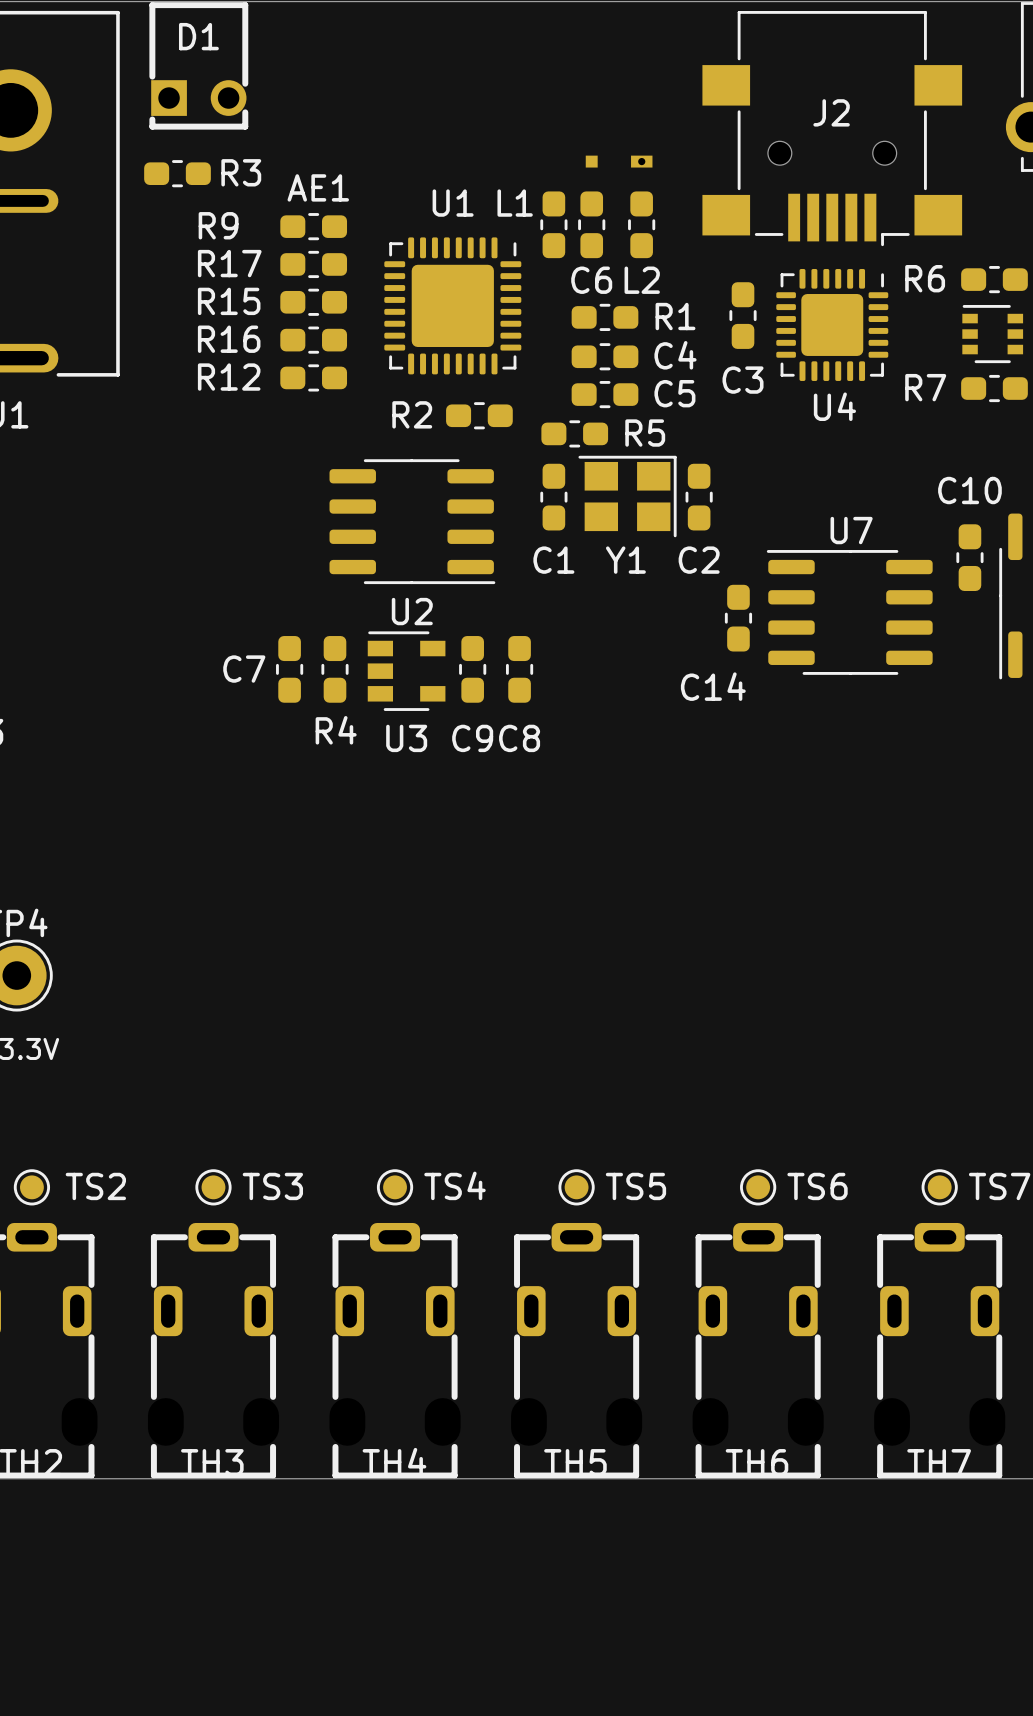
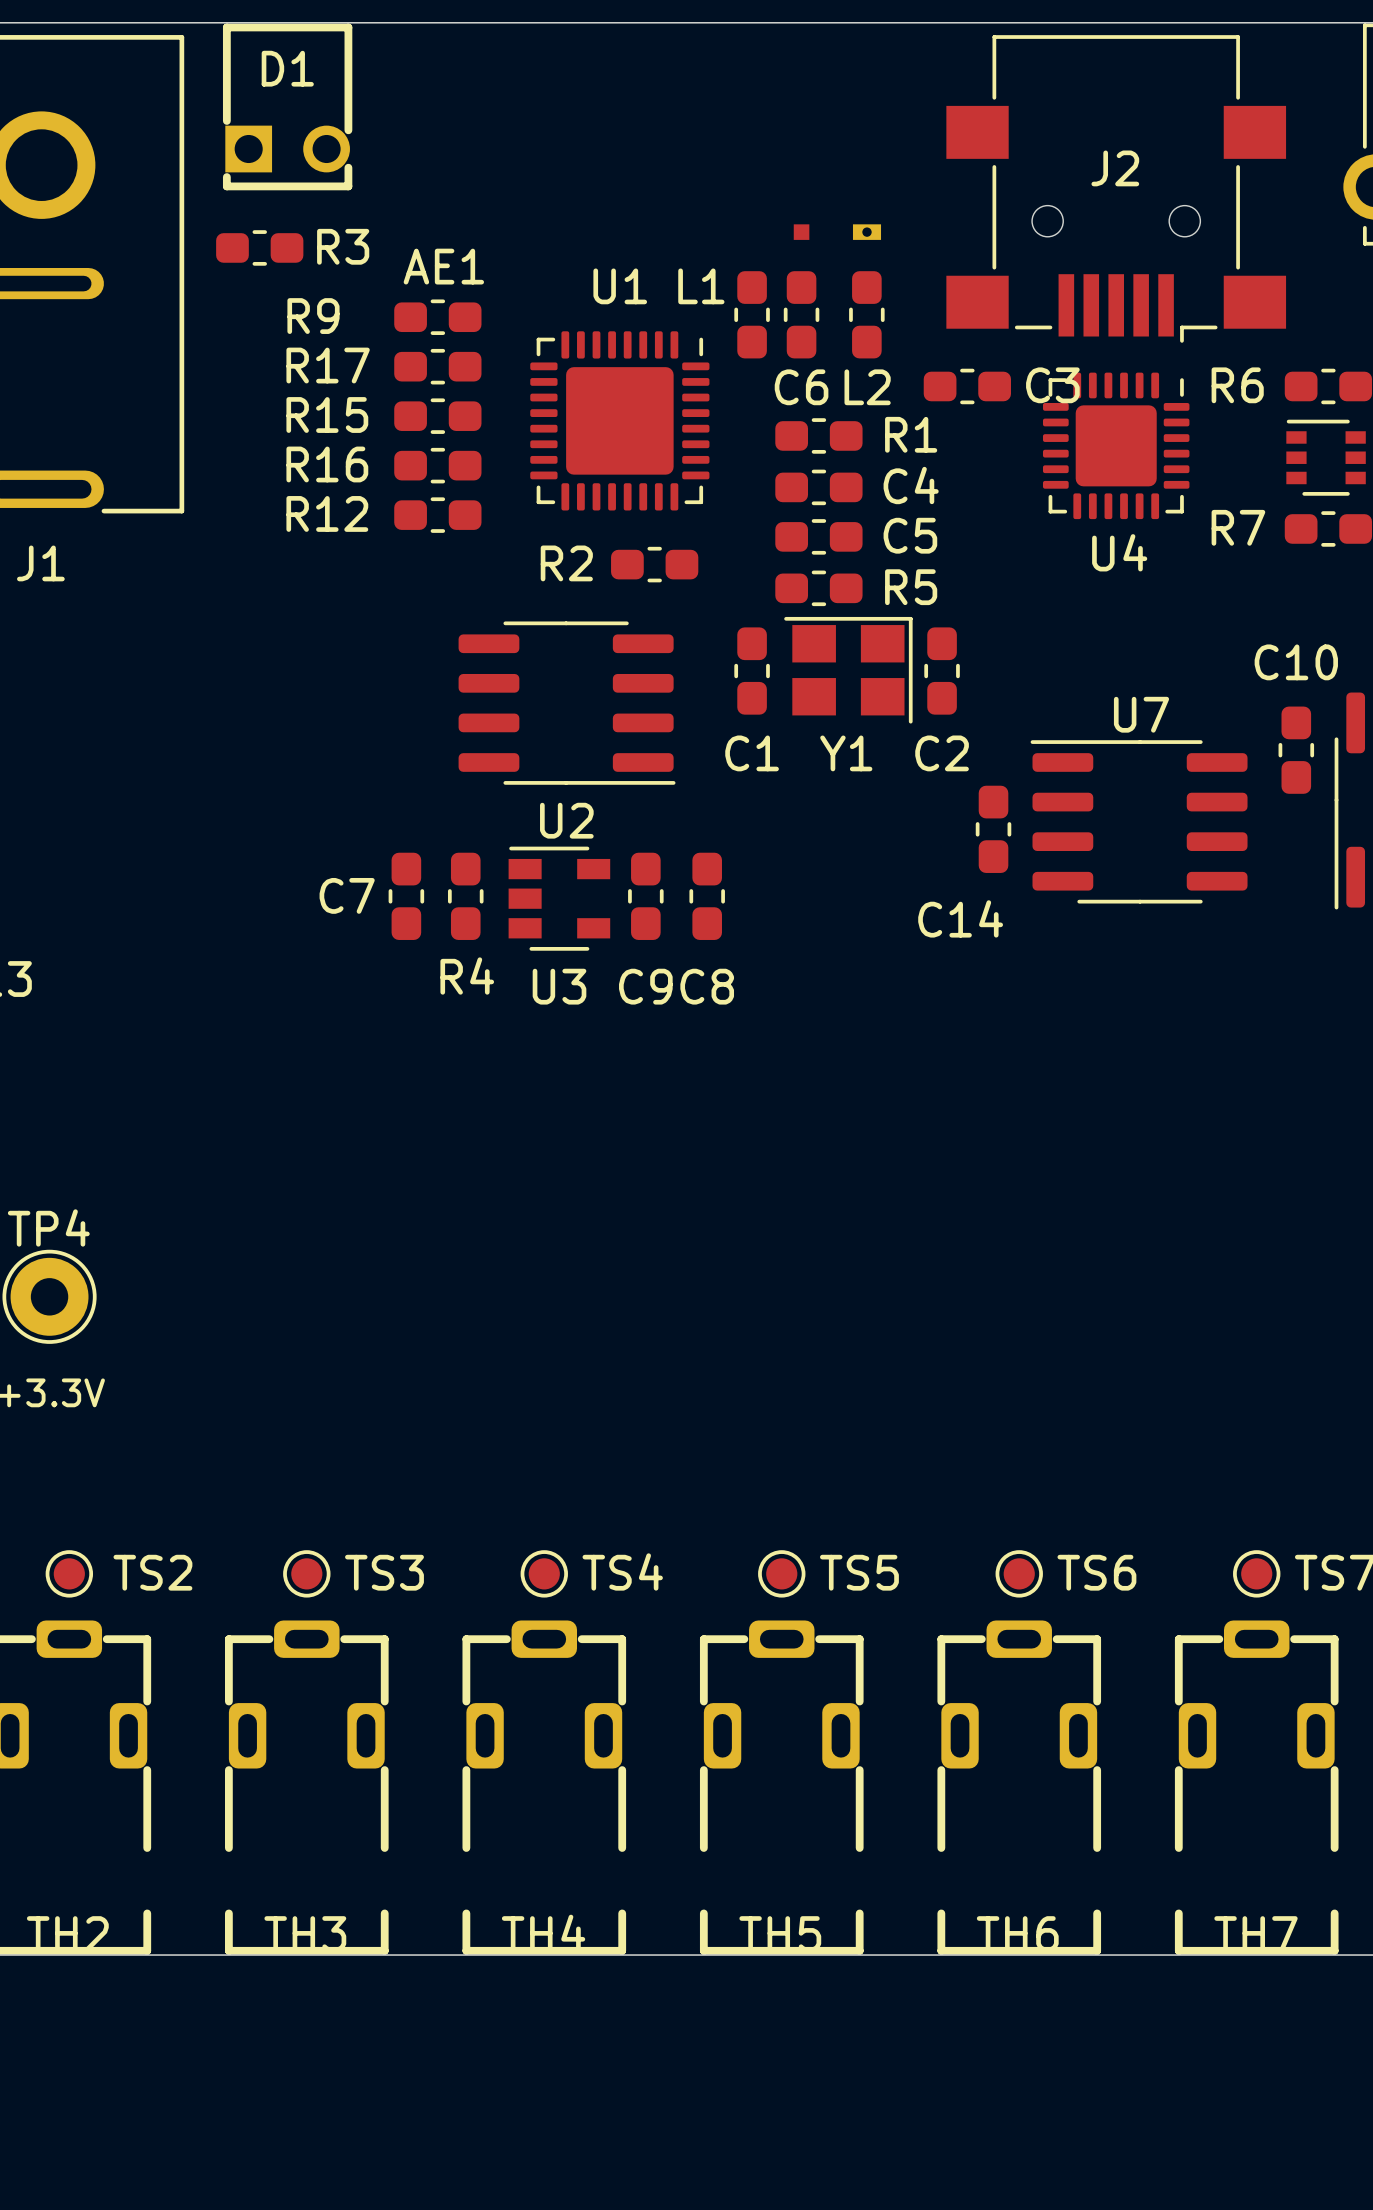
C3 rotation: 0° (743, 315) -> 90° clockwise (967, 386)
C3 position: (743, 315) -> (967, 386)
C3 name position: C3 (743, 380) -> C3 (1052, 385)
R5 position: (574, 433) -> (818, 588)

